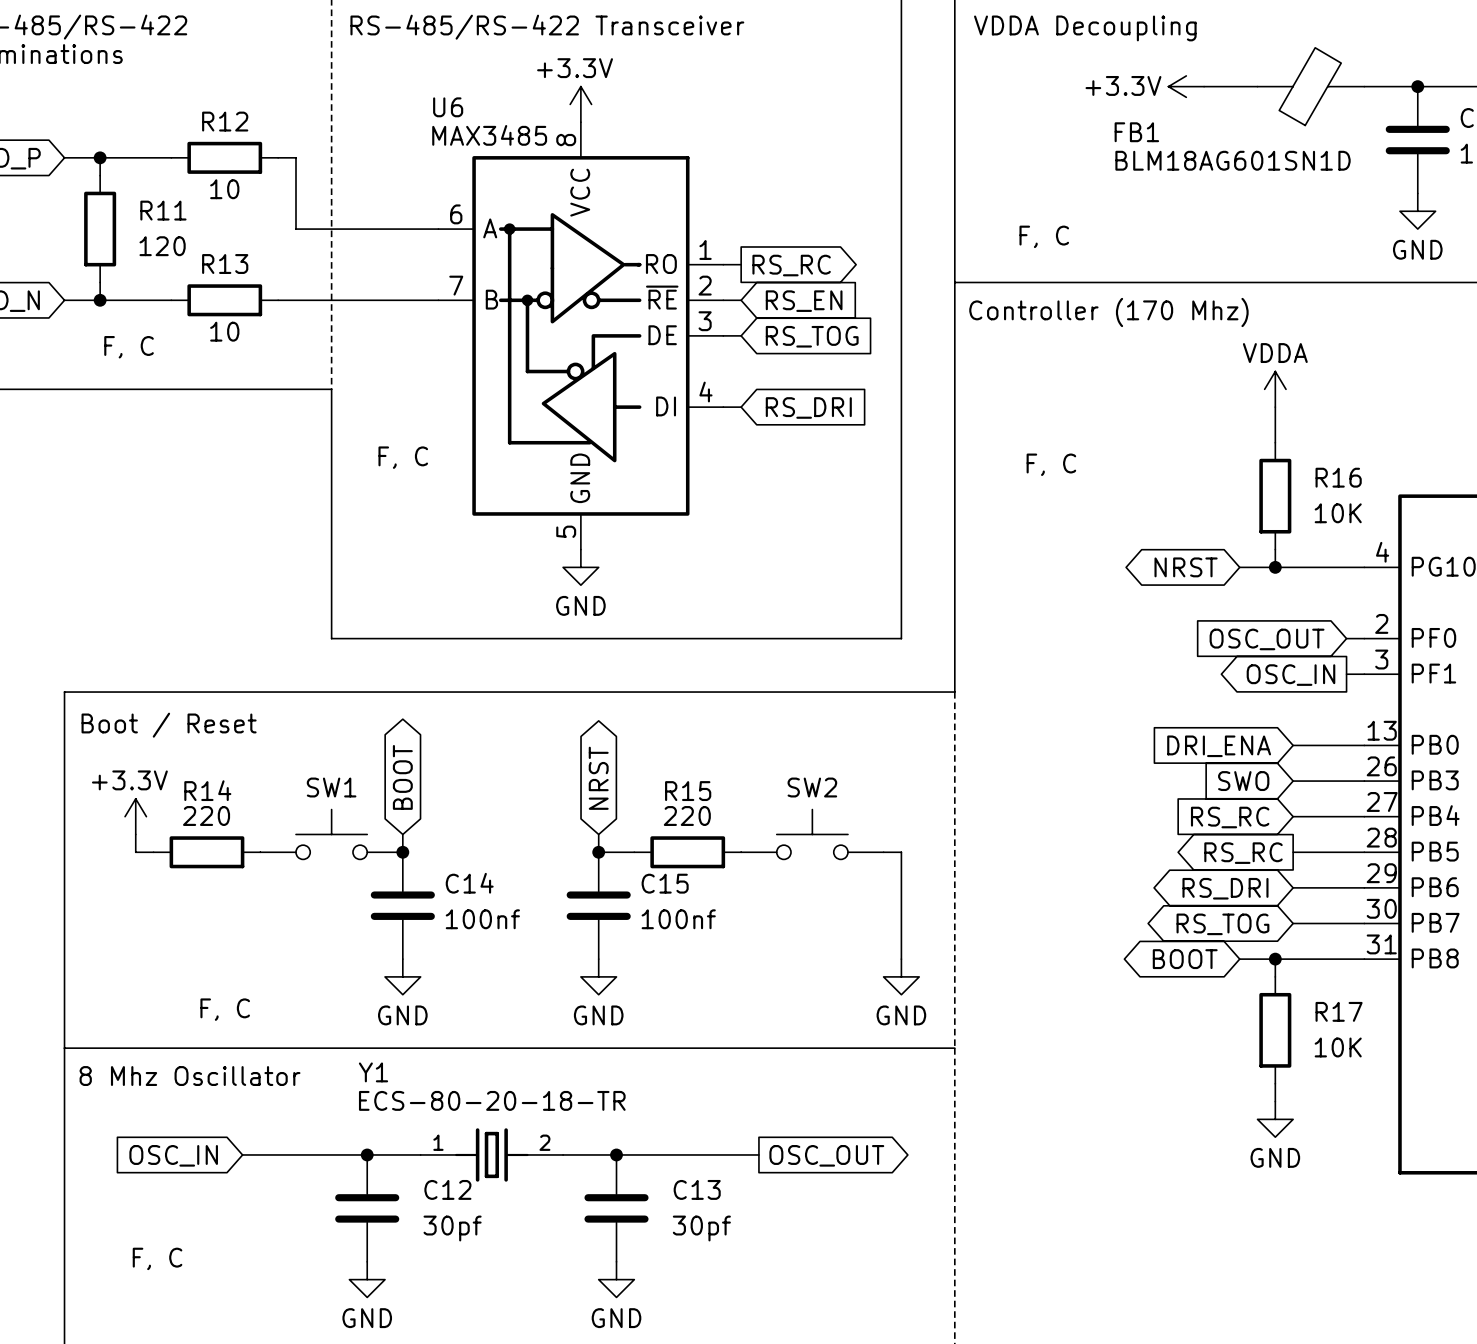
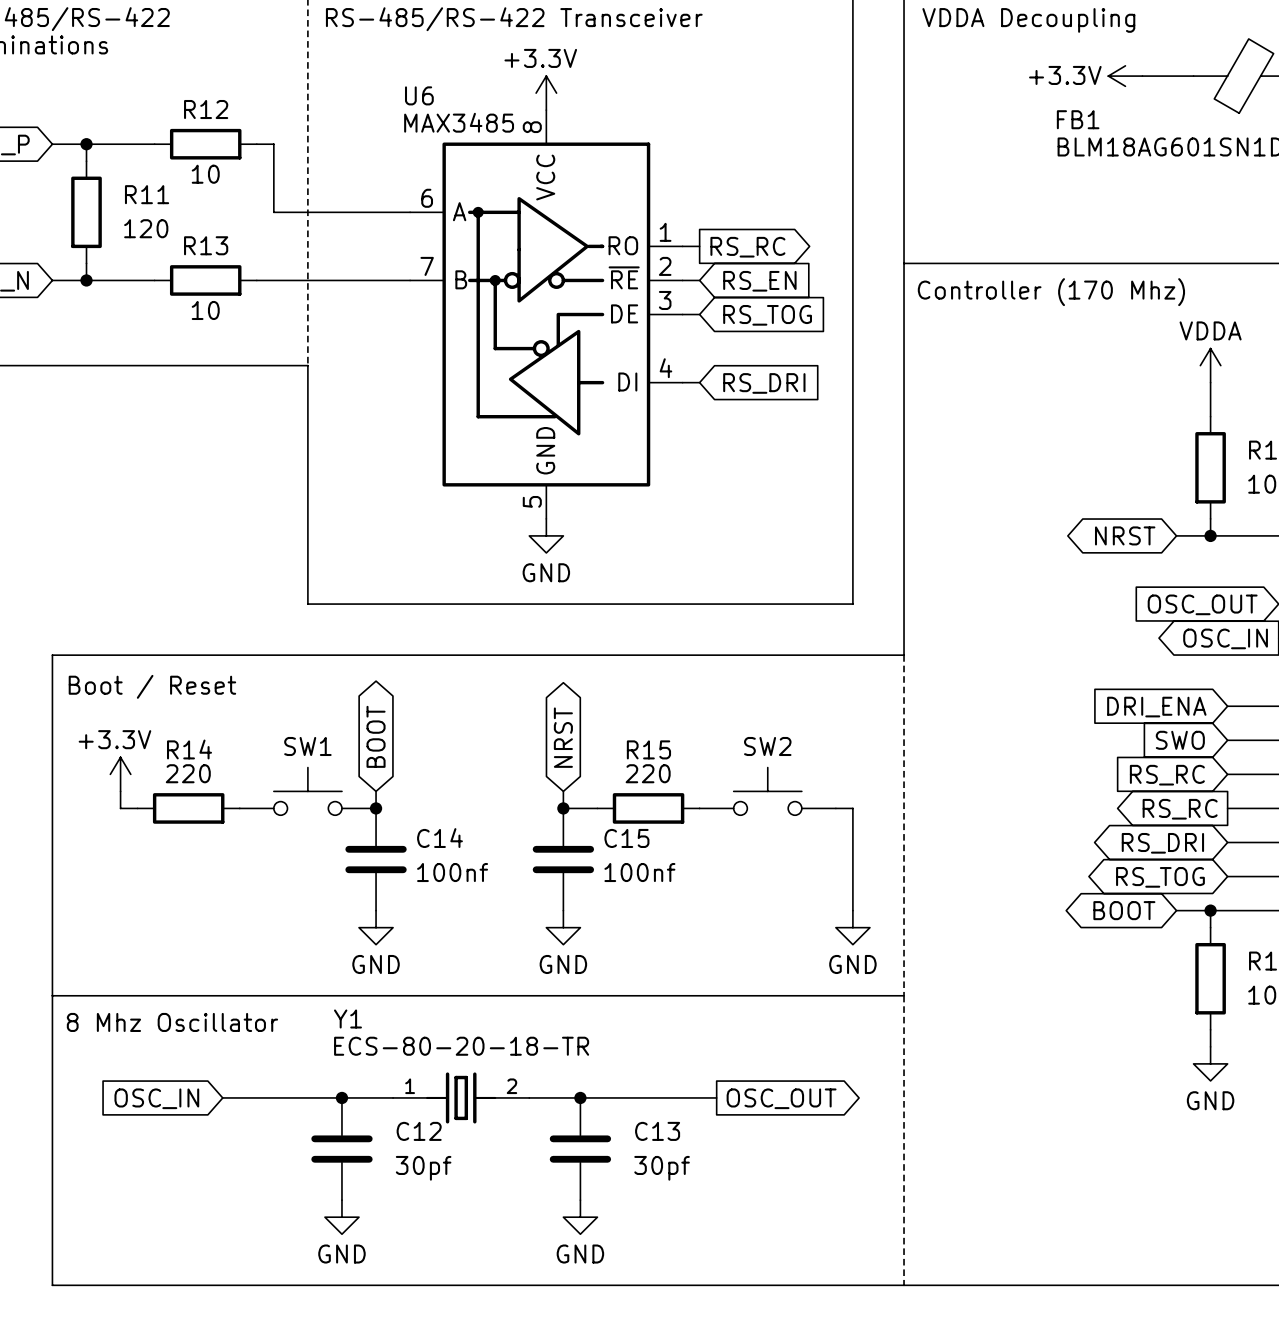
text: F, C (1044, 236) -> none
text: F, C (129, 347) -> none
text: F, C (403, 457) -> none
text: F, C (1051, 464) -> none
text: F, C (225, 1009) -> none
text: F, C (157, 1258) -> none

